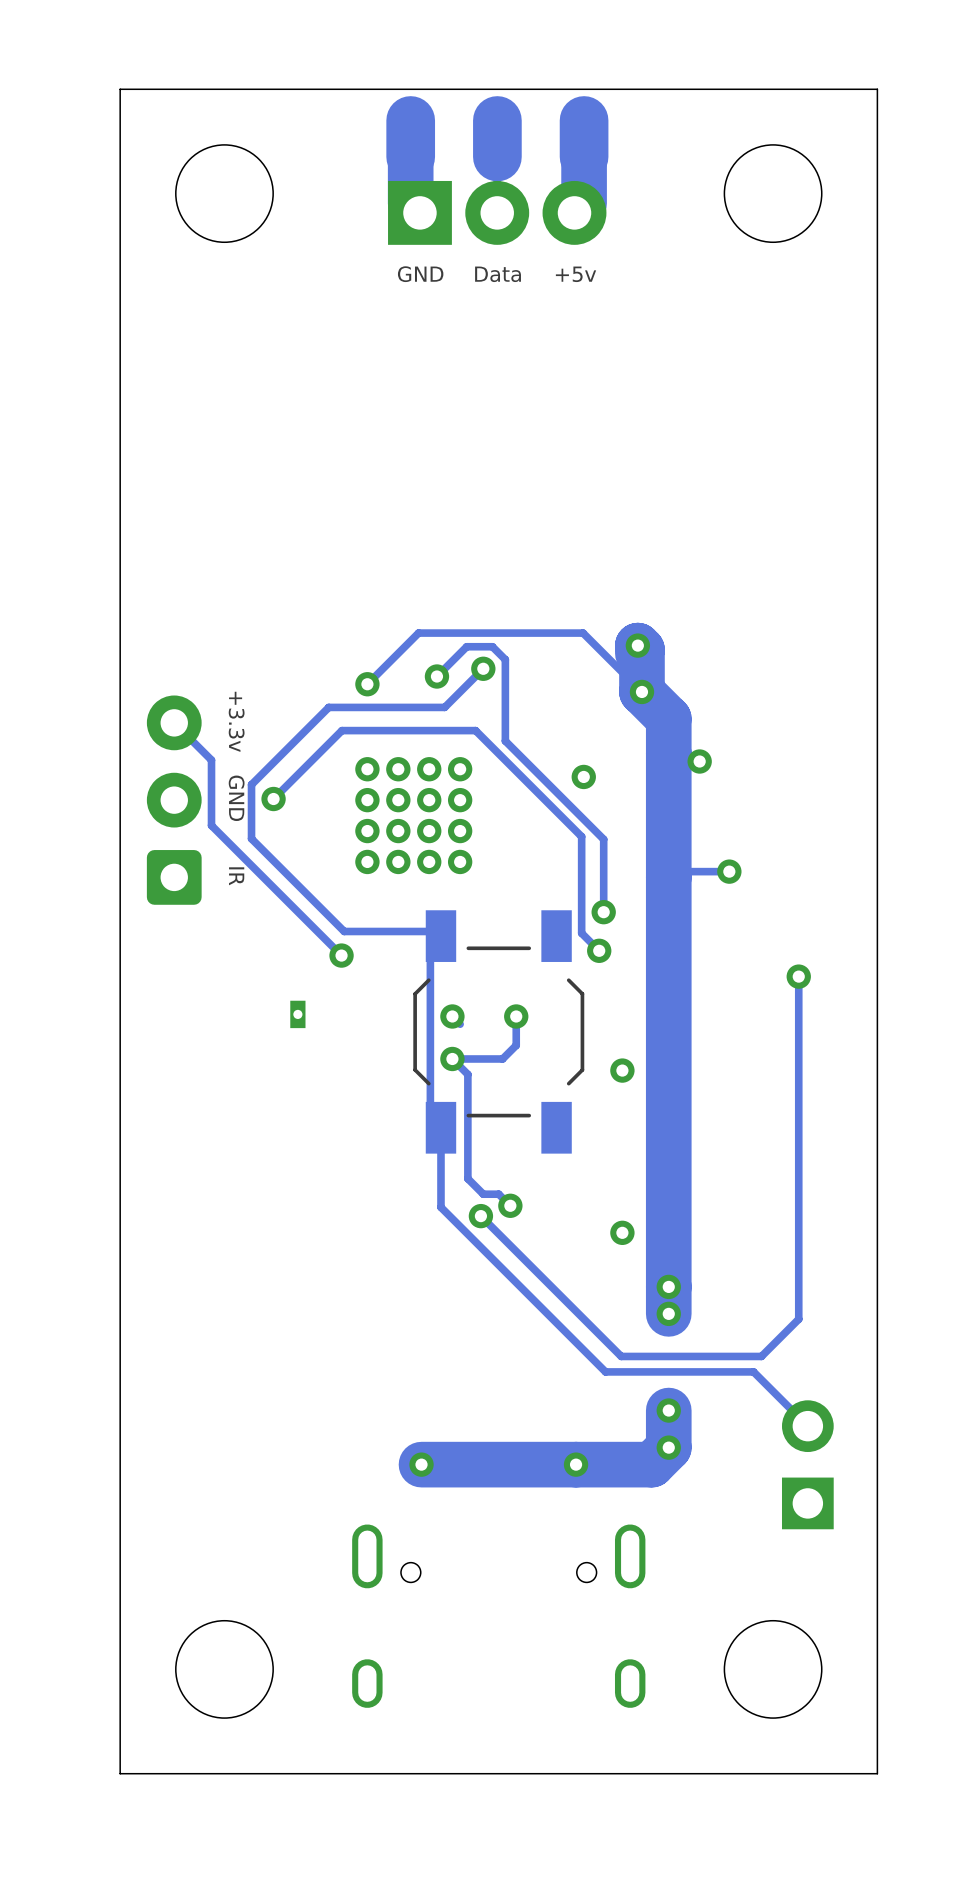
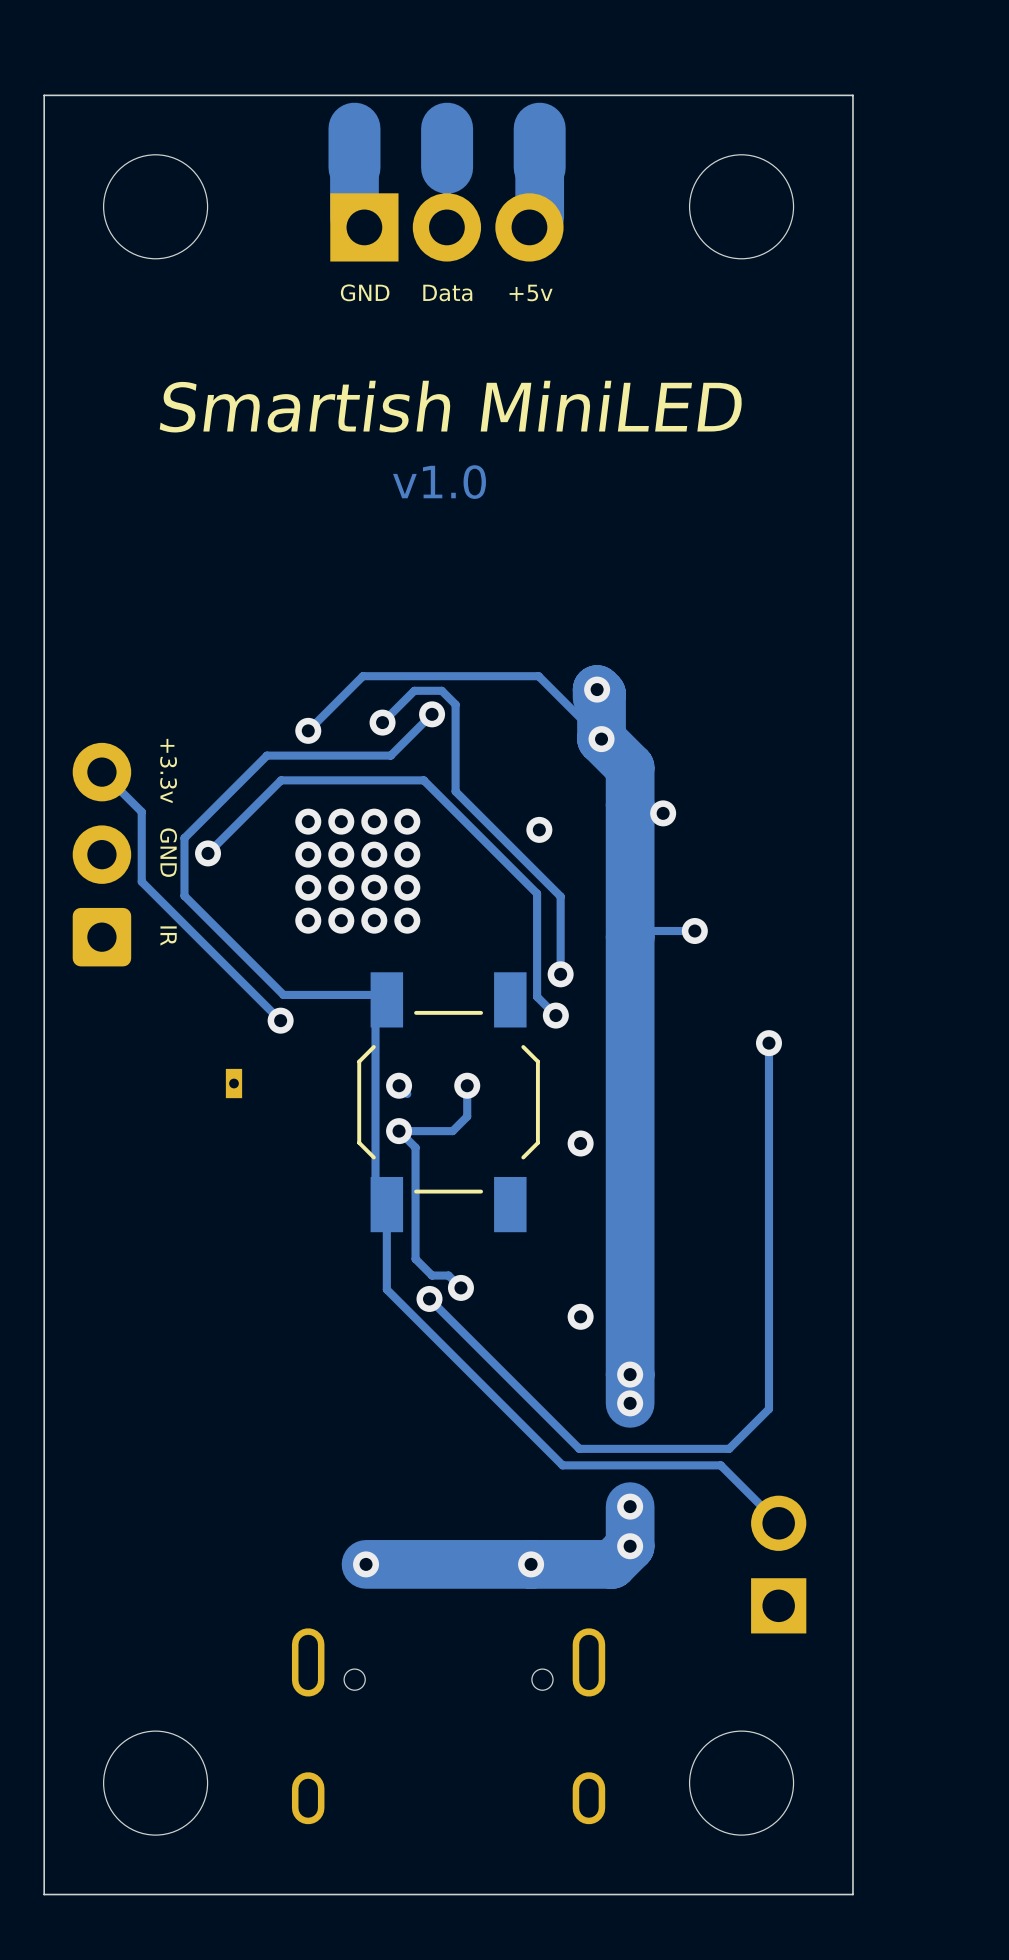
text: none -> Smartish MiniLED (451, 406)
text: none -> v1.0 (439, 482)

